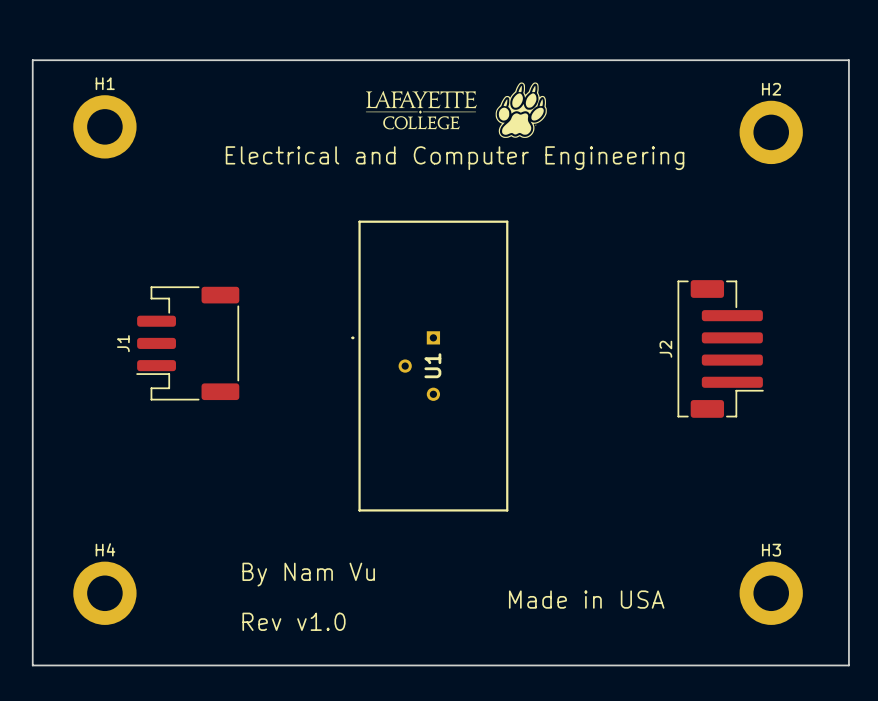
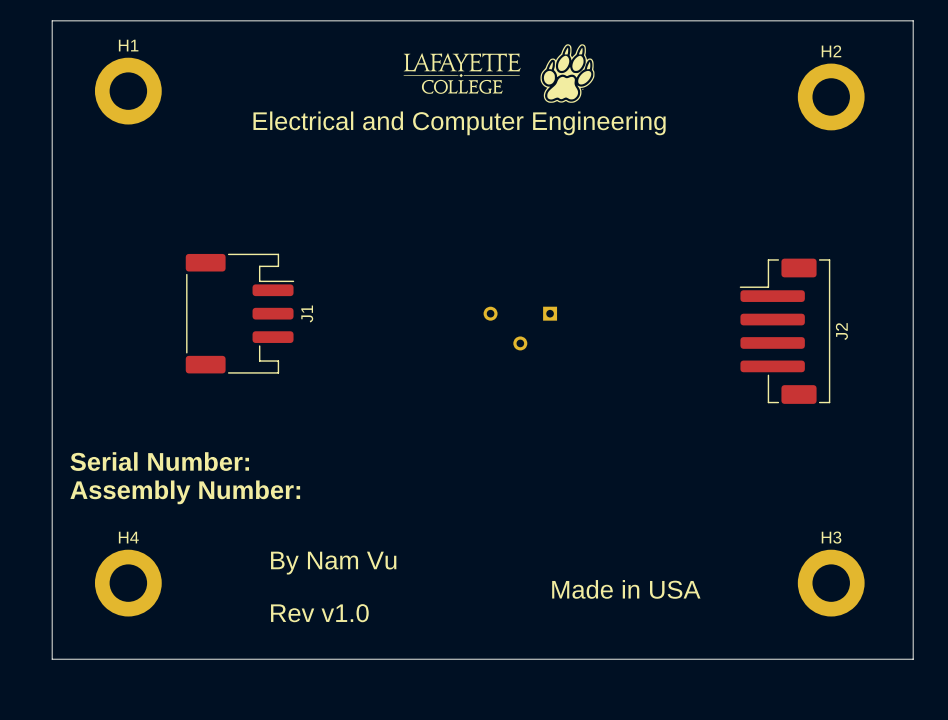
J1 rotation: 0° (187, 343) -> 180° (239, 313)
J2 rotation: 0° (720, 348) -> 180° (785, 331)
U1 side: top (430, 366) -> bottom (520, 328)
text: none -> Serial Number: (159, 461)
text: none -> Assembly Number: (185, 492)

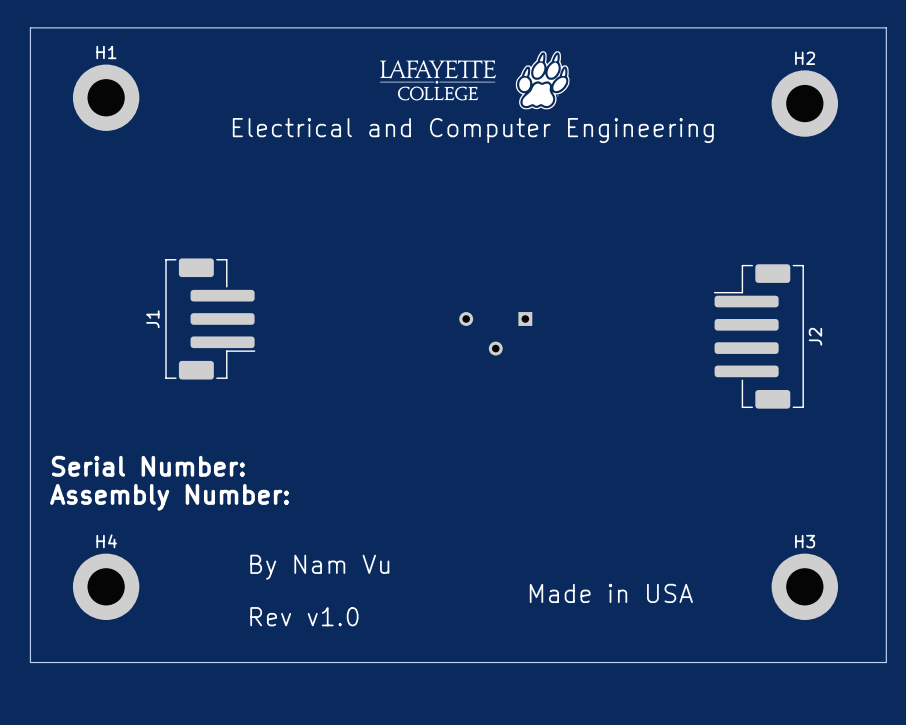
J1 footprint: [185, 253, 295, 374] -> [165, 258, 256, 380]
J1 name position: J1 (307, 313) -> J1 (152, 319)

